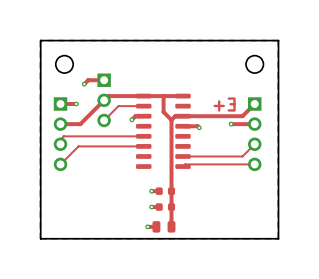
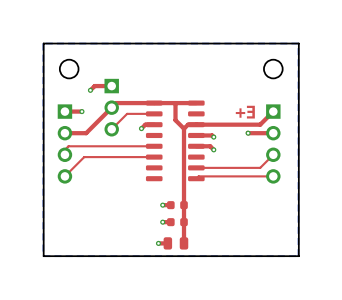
top track: none -> (196, 146) (210, 146) (213, 149)
via: none -> (213, 149)

